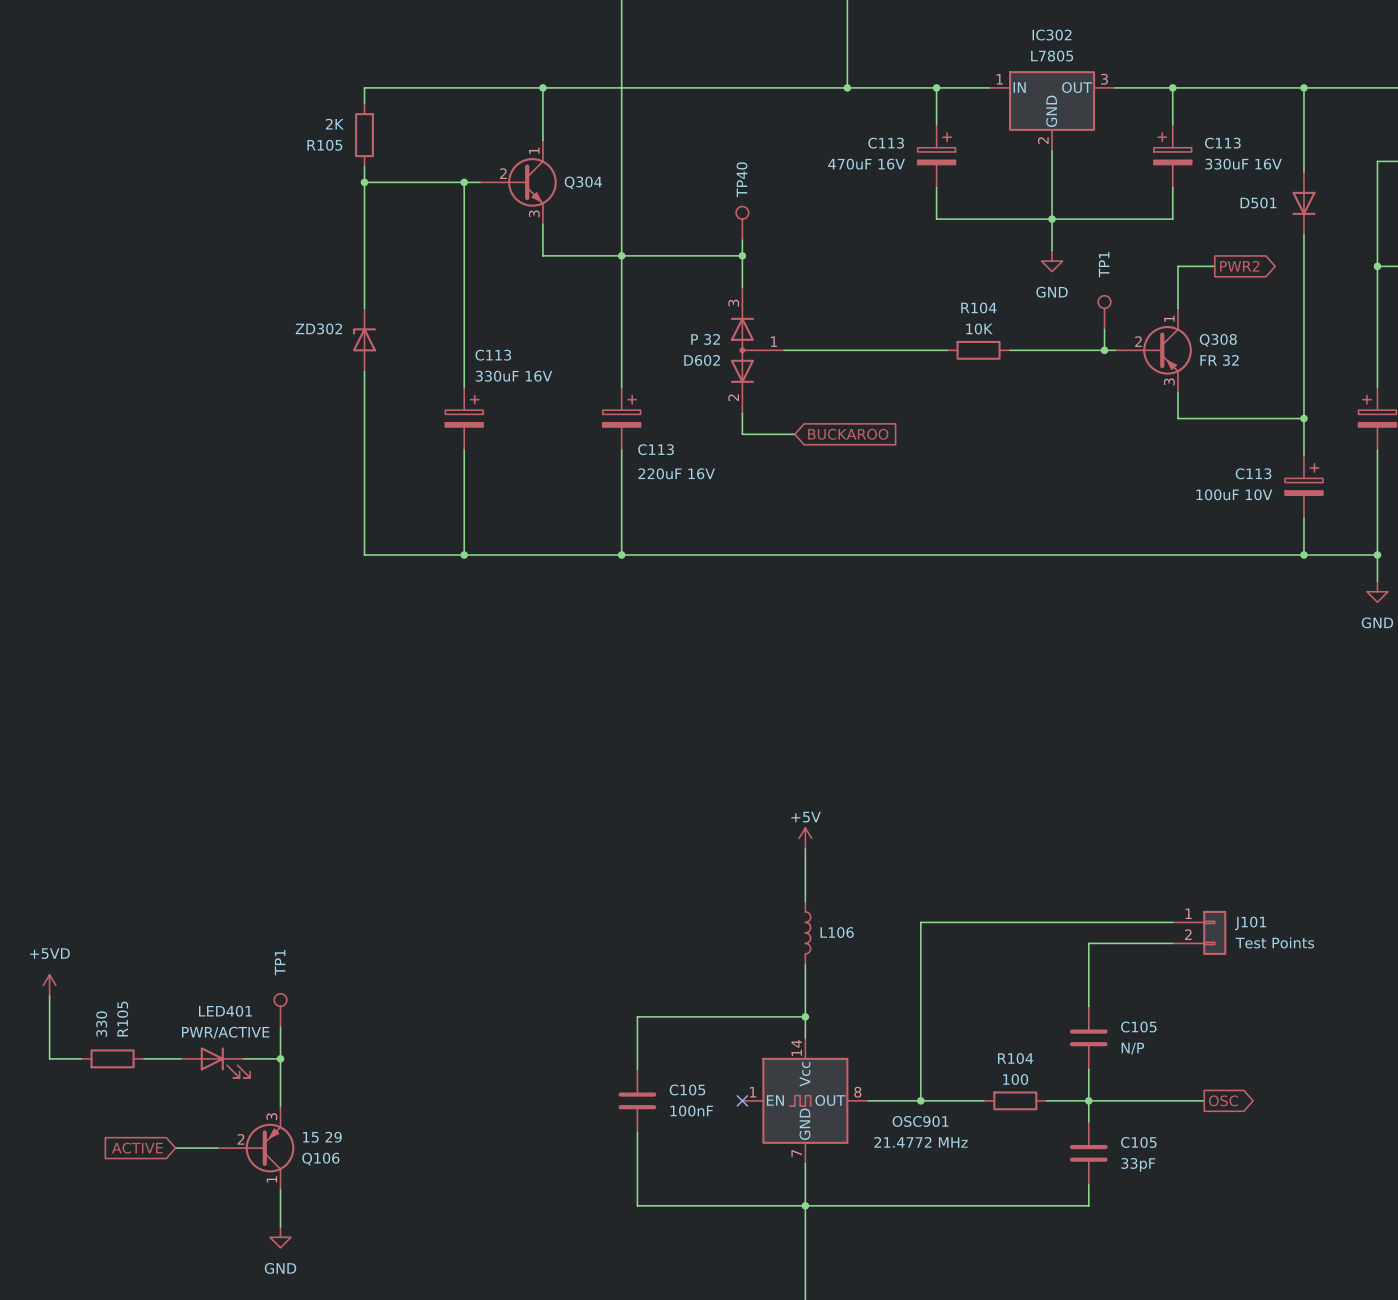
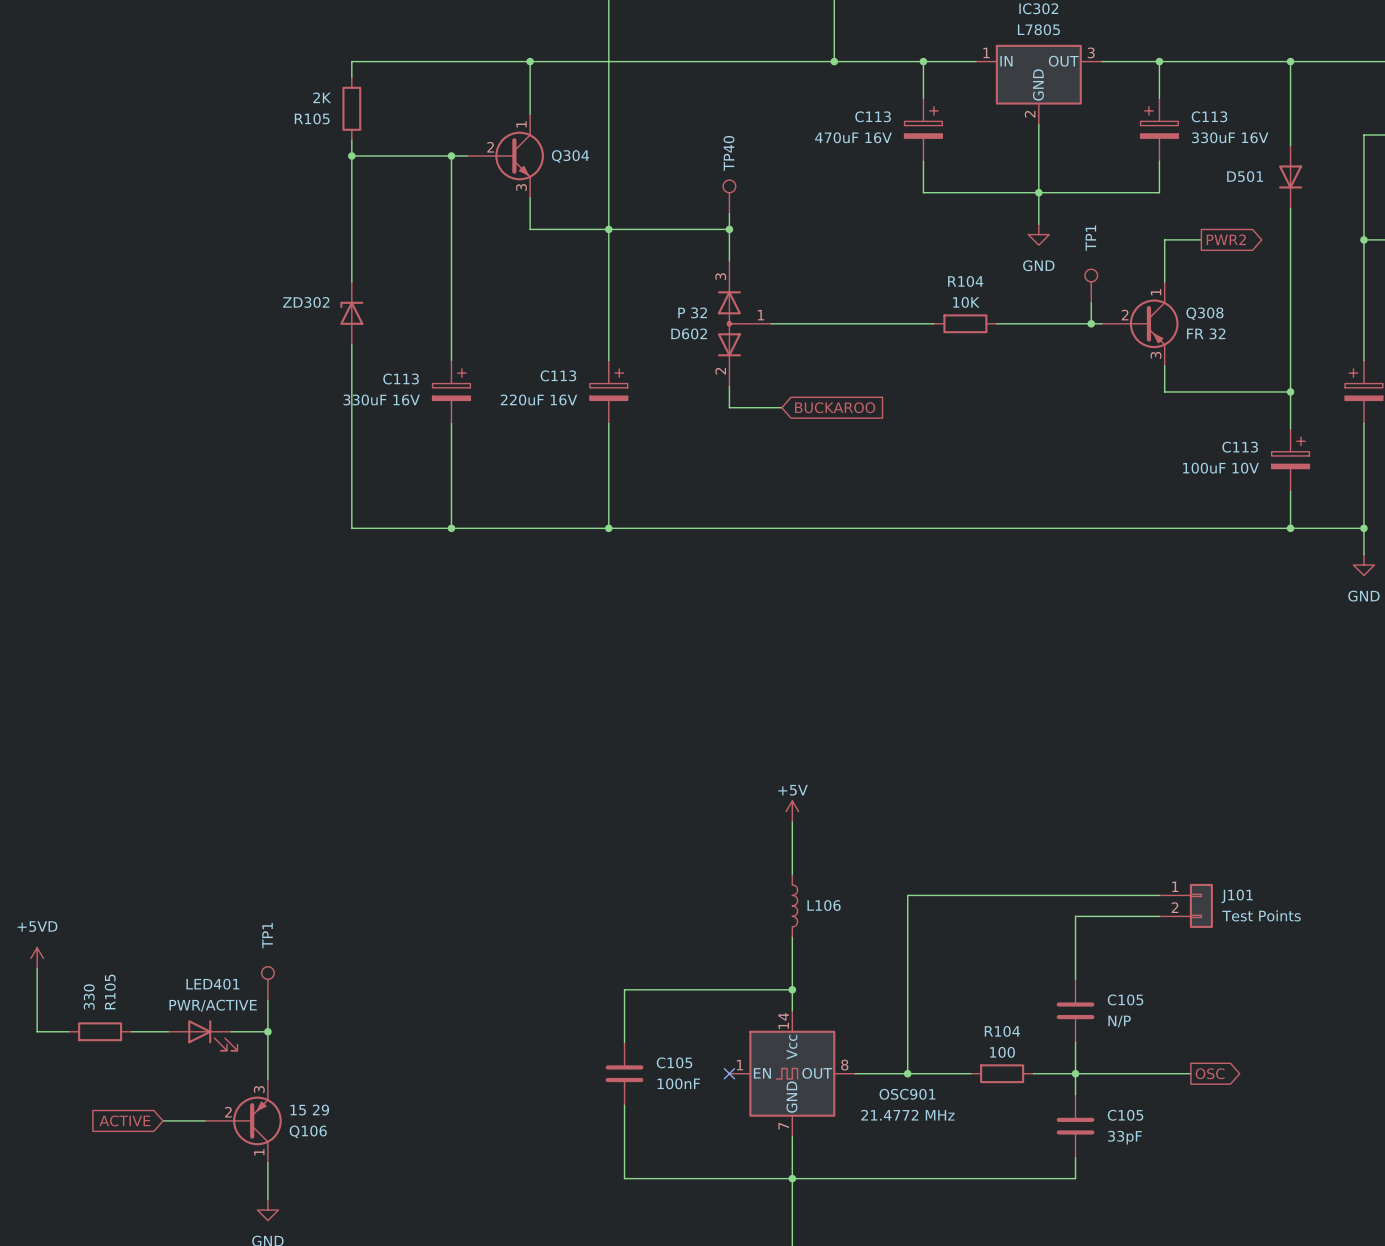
C113 name position: C113 (493, 355) -> C113 (401, 379)
C113 value position: 330uF 16V (514, 376) -> 330uF 16V (381, 399)
C113 name position: C113 (656, 449) -> C113 (558, 375)
C113 value position: 220uF 16V (676, 473) -> 220uF 16V (539, 399)

